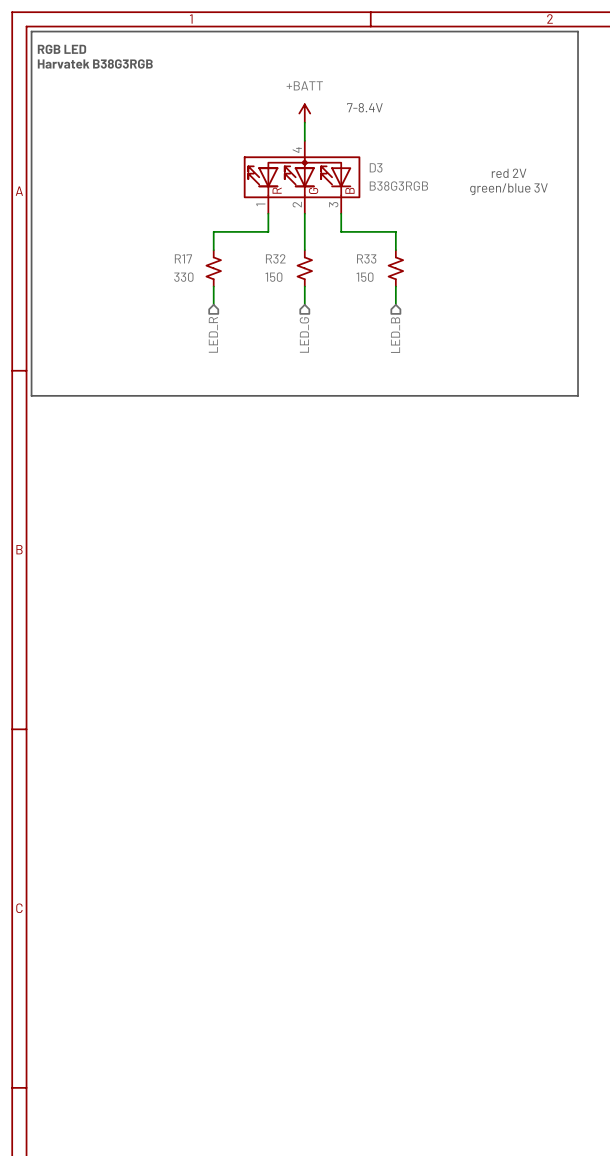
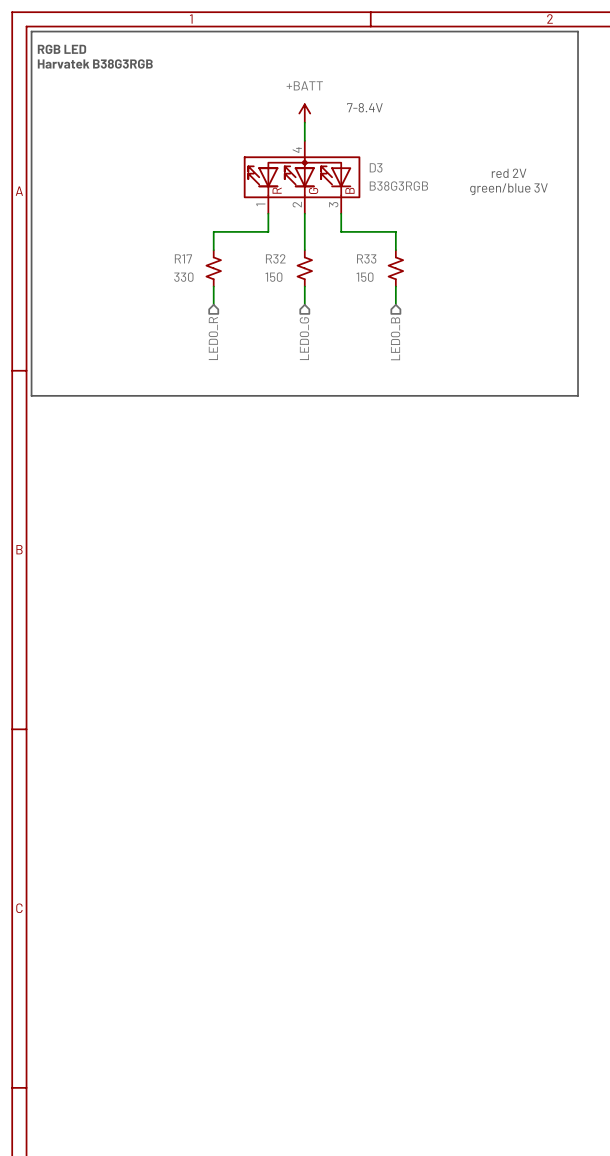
hierarchical label: LED_R (213, 334) -> LED0_R (213, 338)
hierarchical label: LED_G (304, 334) -> LED0_G (304, 338)
hierarchical label: LED_B (395, 335) -> LED0_B (395, 338)

